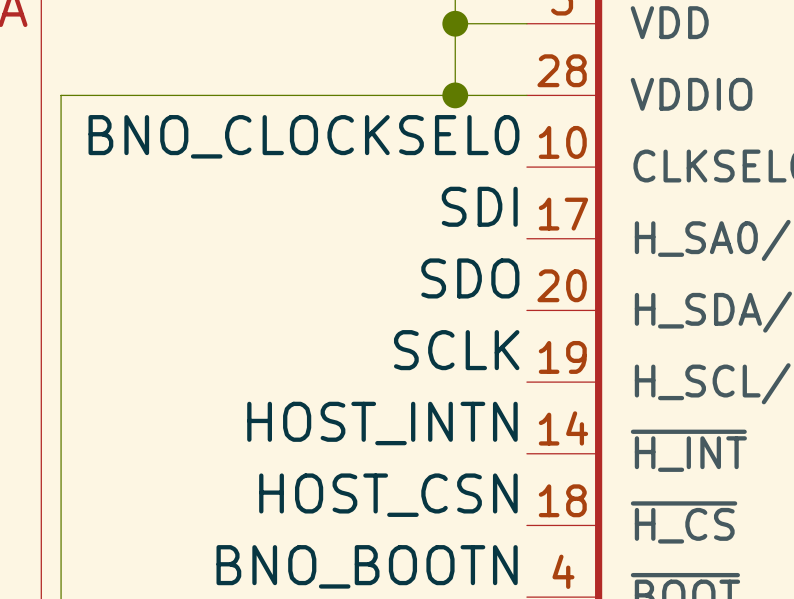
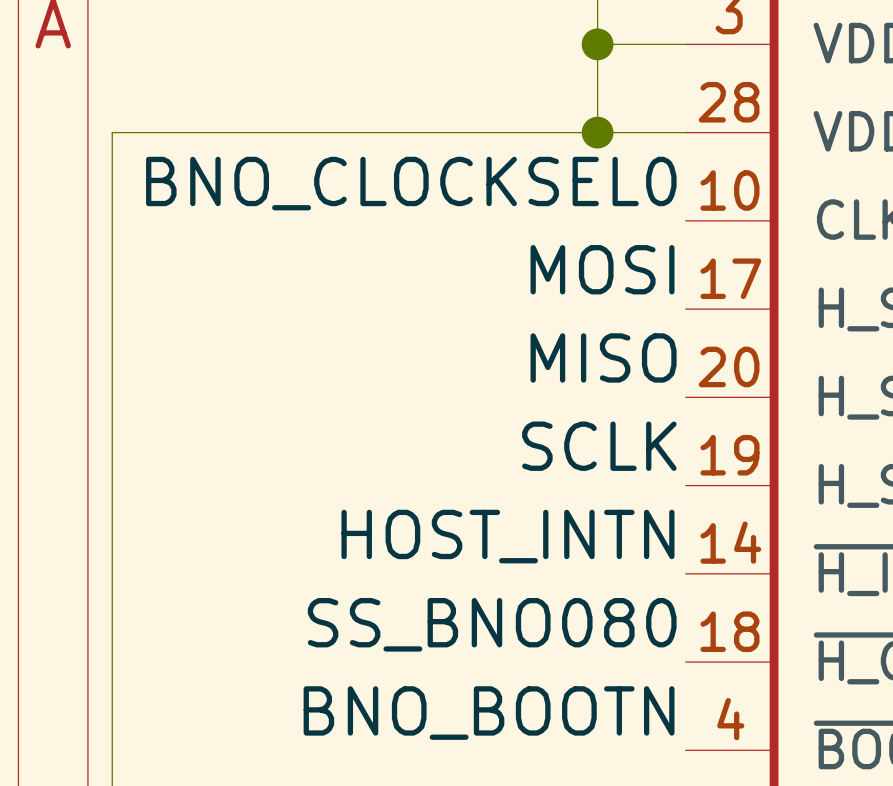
label: SDI (479, 206) -> MOSI (602, 269)
label: SDO (470, 278) -> MISO (603, 357)
label: HOST_CSN (388, 495) -> SS_BNO080 (492, 624)

